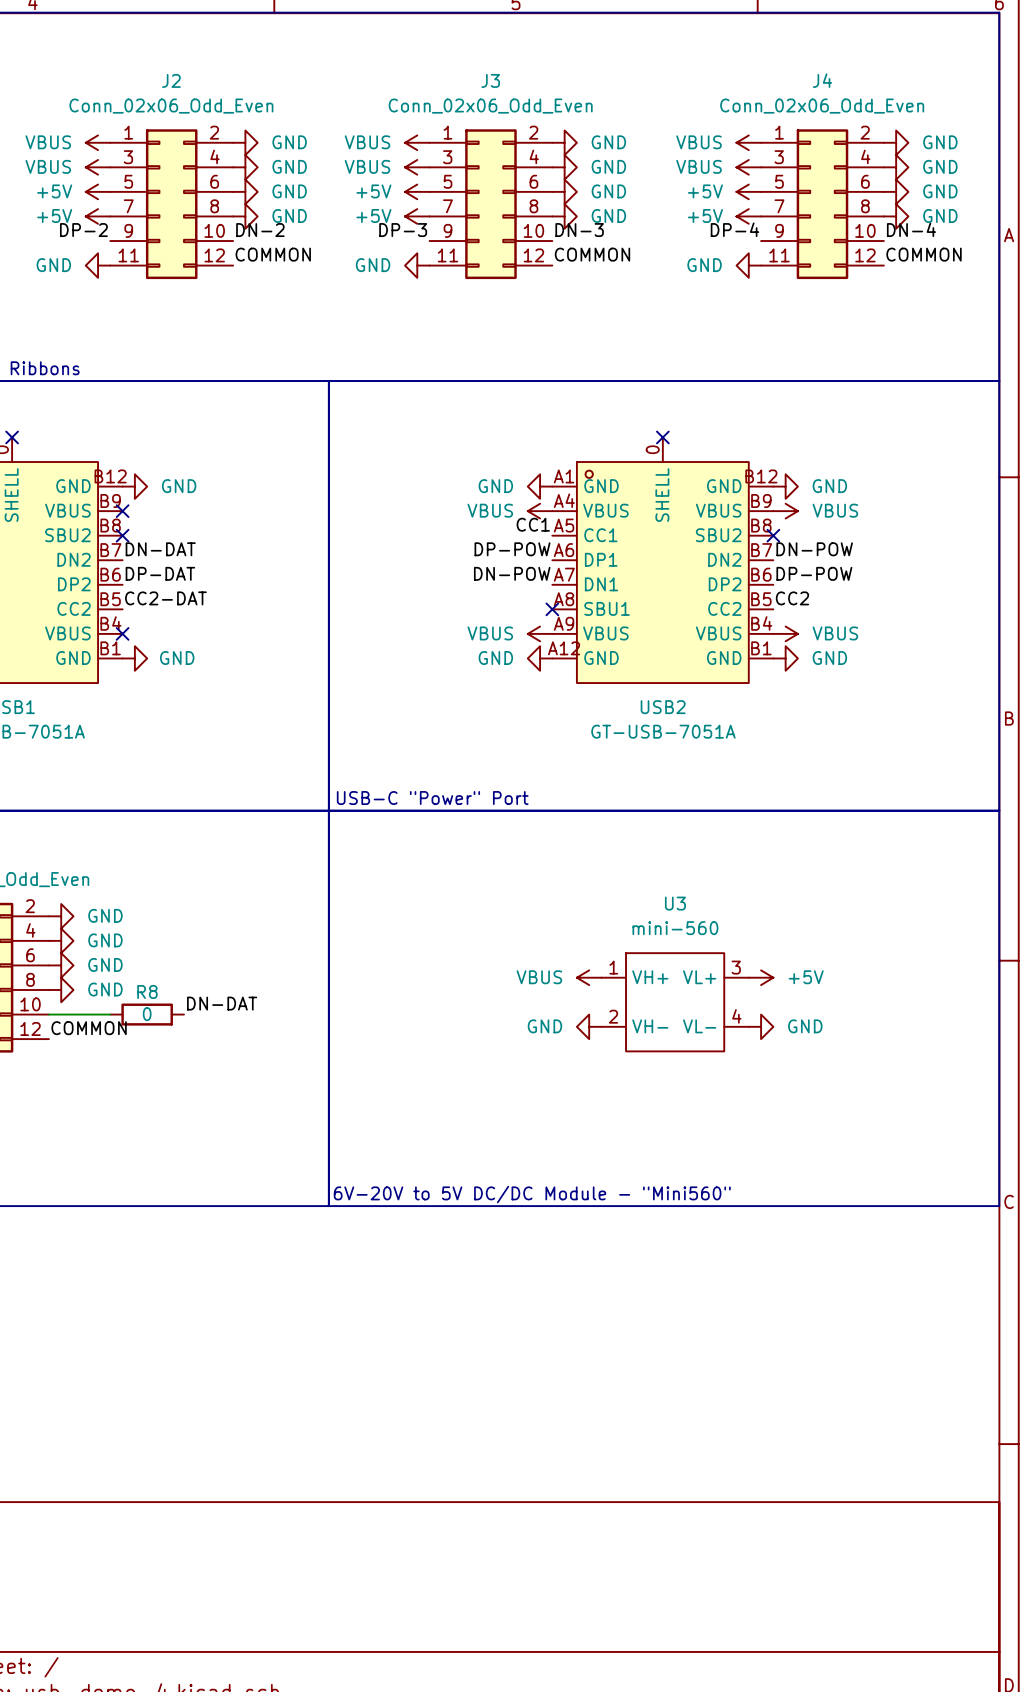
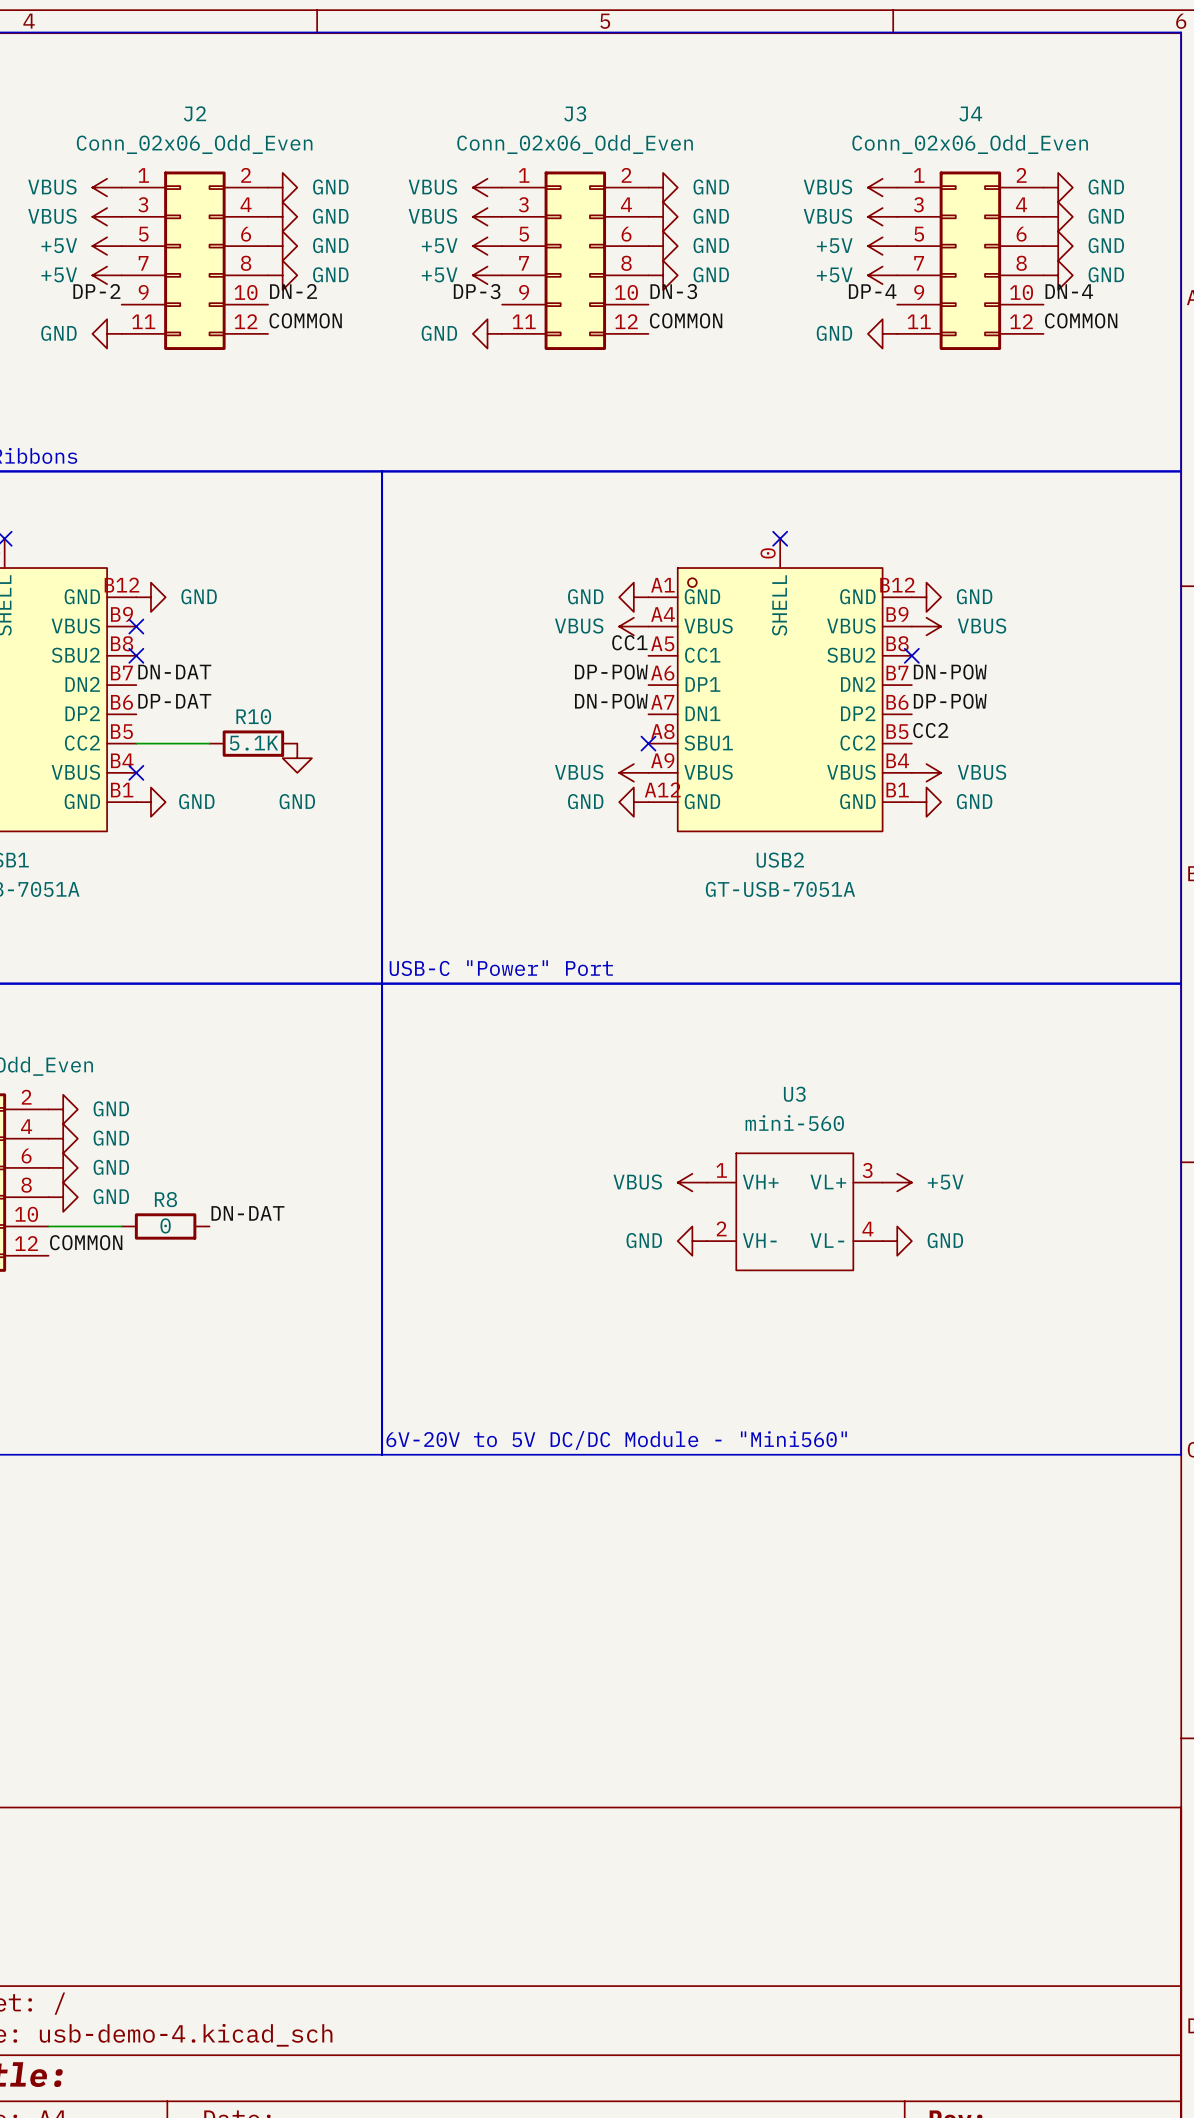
label: CC2-DAT (165, 598) -> none
wire: none -> (136, 743) (209, 743)
R10: none -> 5.1K (253, 743)
power symbol: none -> GND (297, 758)

